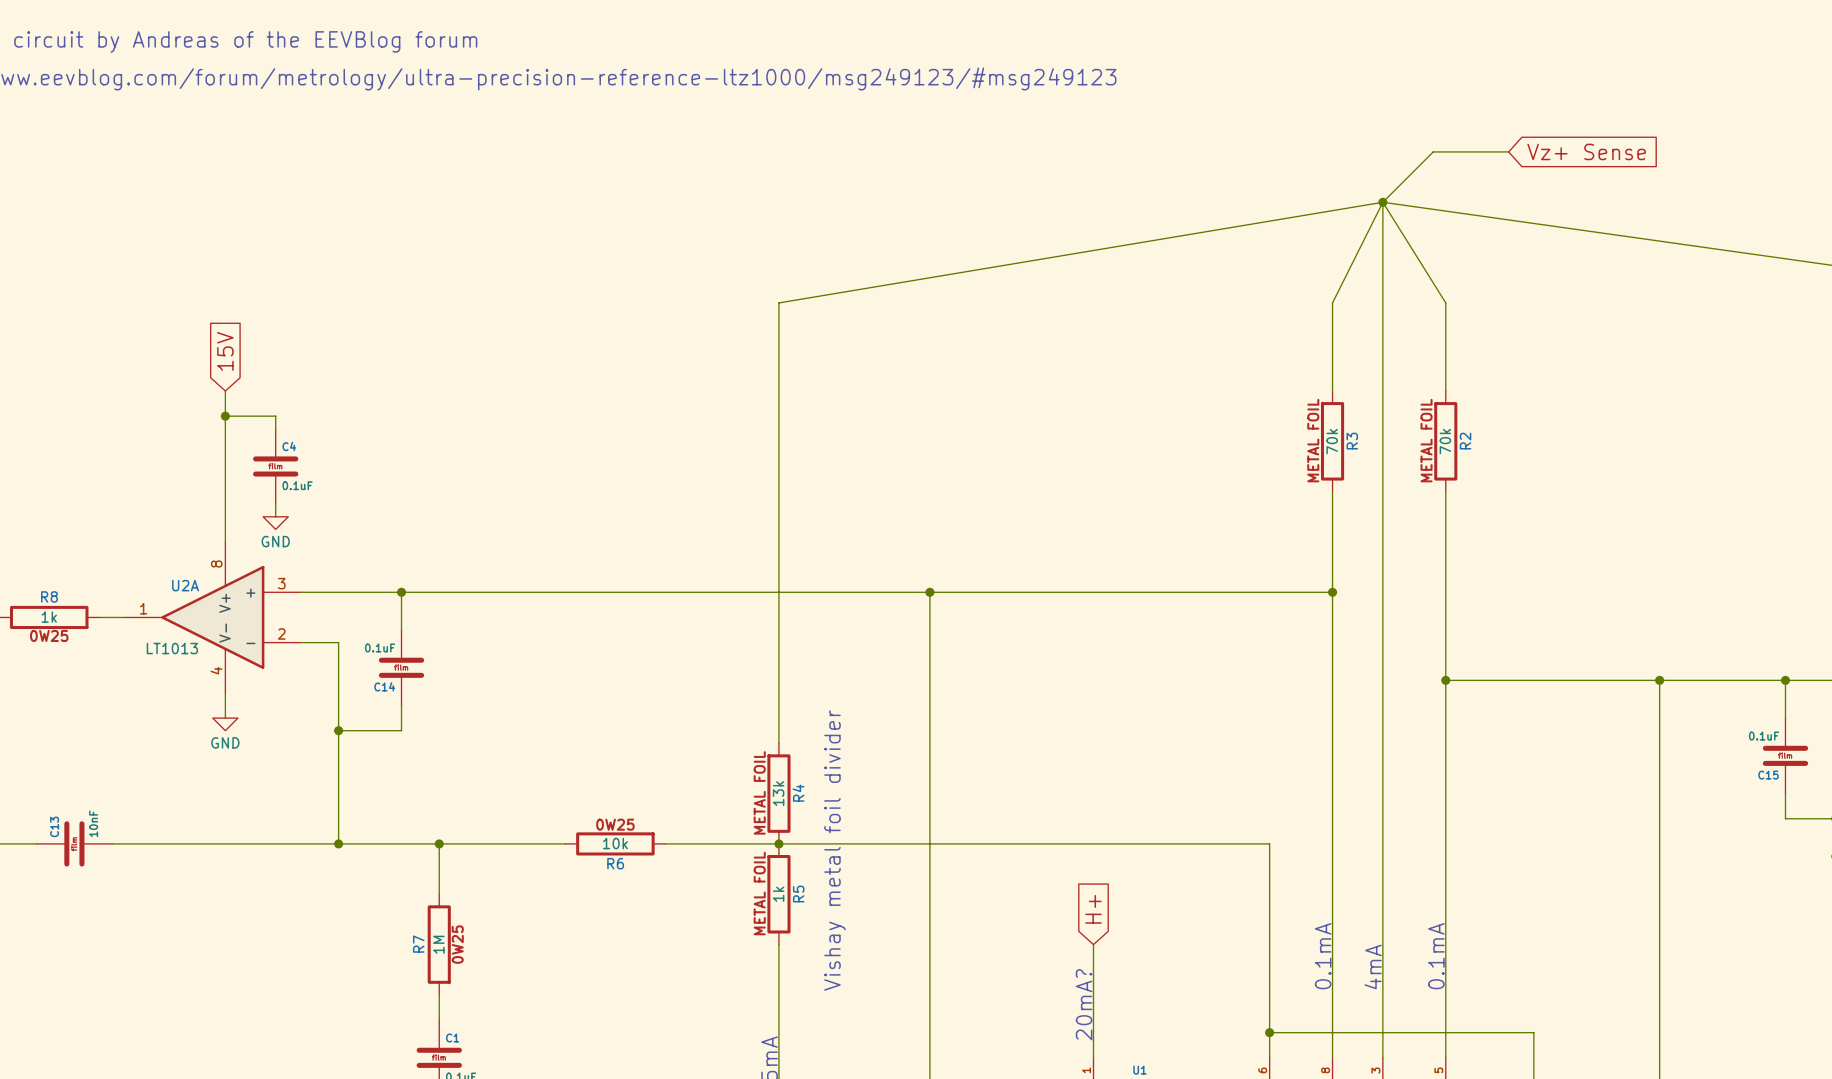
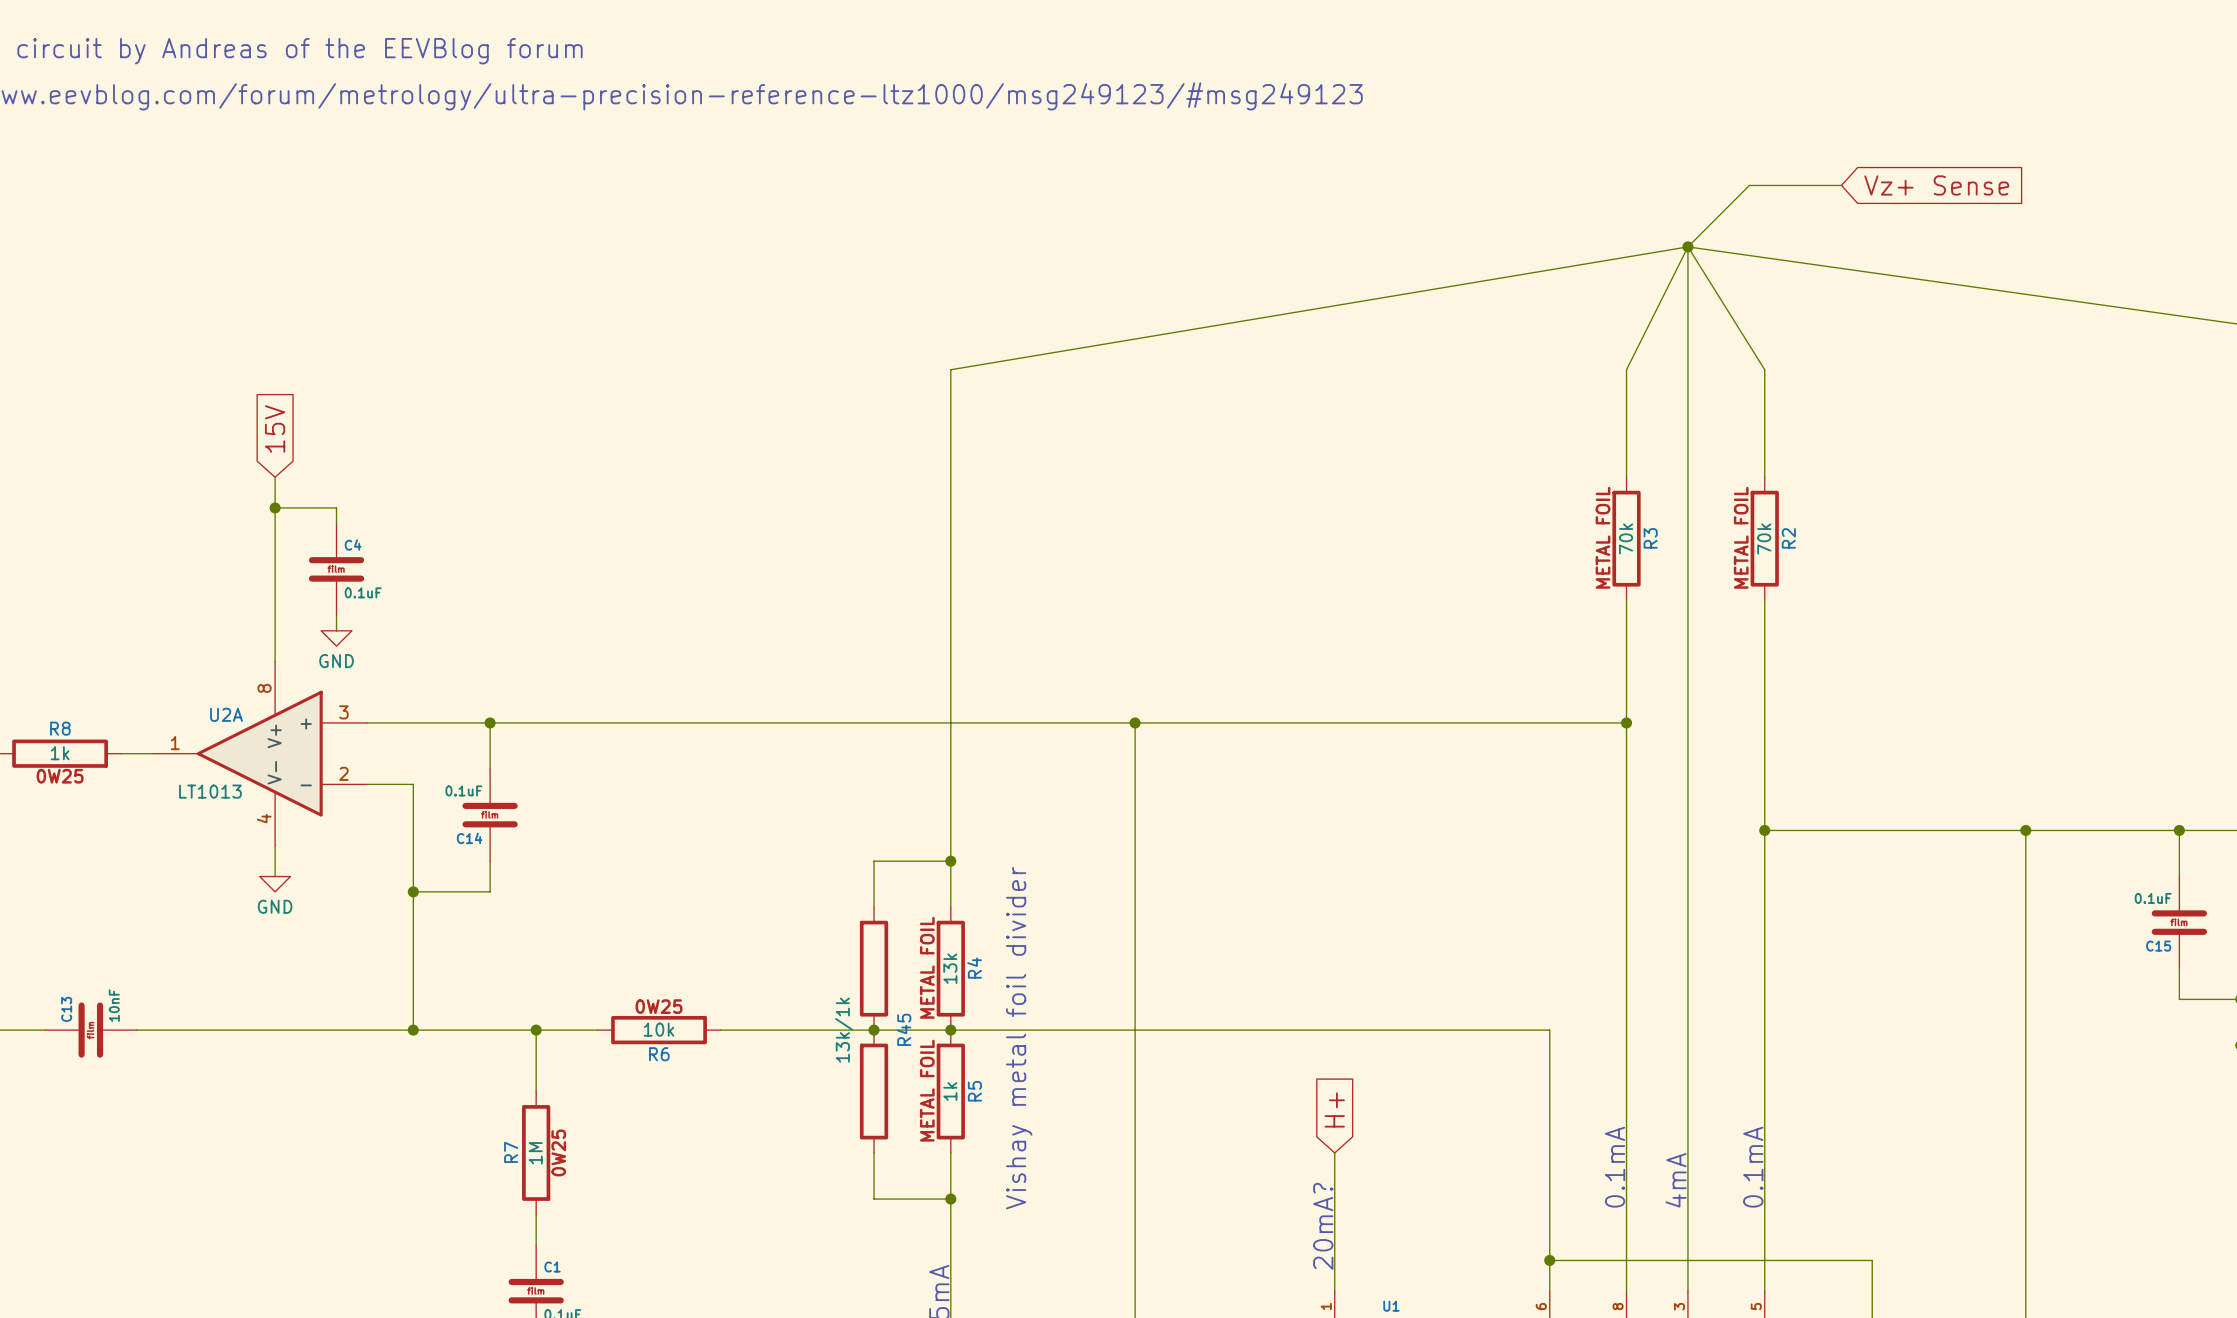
wire: none -> (950, 861) (874, 861) (874, 907)
junction: none -> (950, 861)
wire: (489, 843) (565, 843) -> (720, 1030) (812, 1030)
R6 position: (615, 843) -> (659, 1030)
R45: none -> 13k/1k (874, 1030)
junction: none -> (874, 1030)
wire: none -> (874, 1152) (874, 1199) (950, 1199)
junction: none -> (950, 1199)

